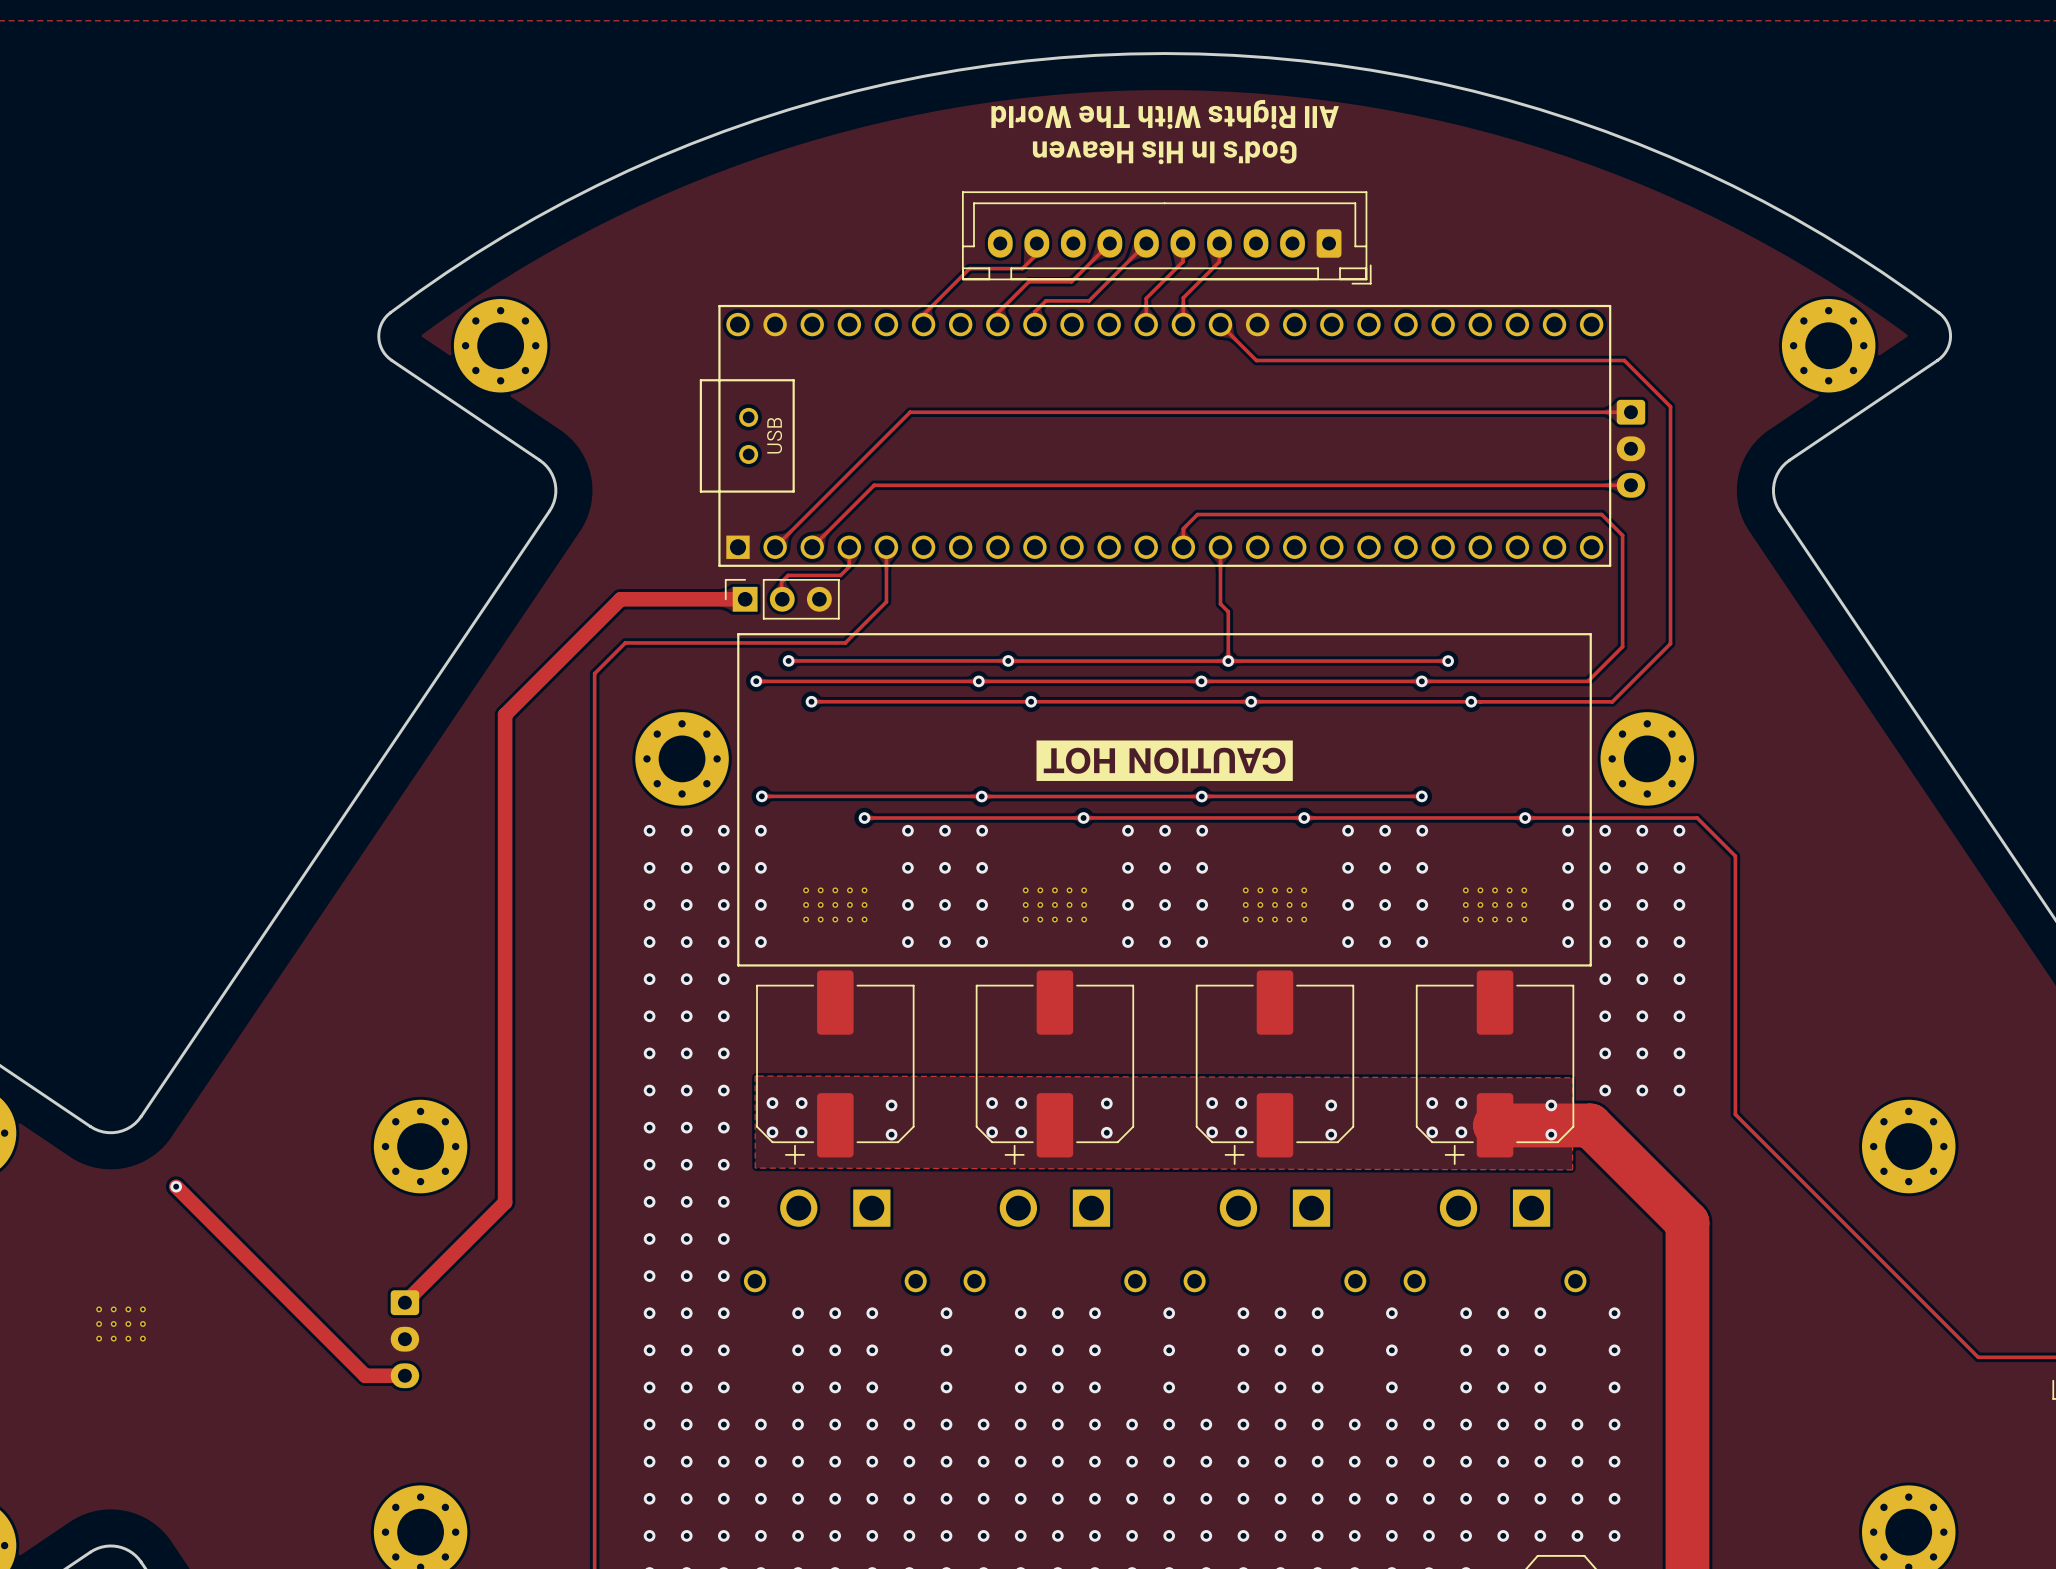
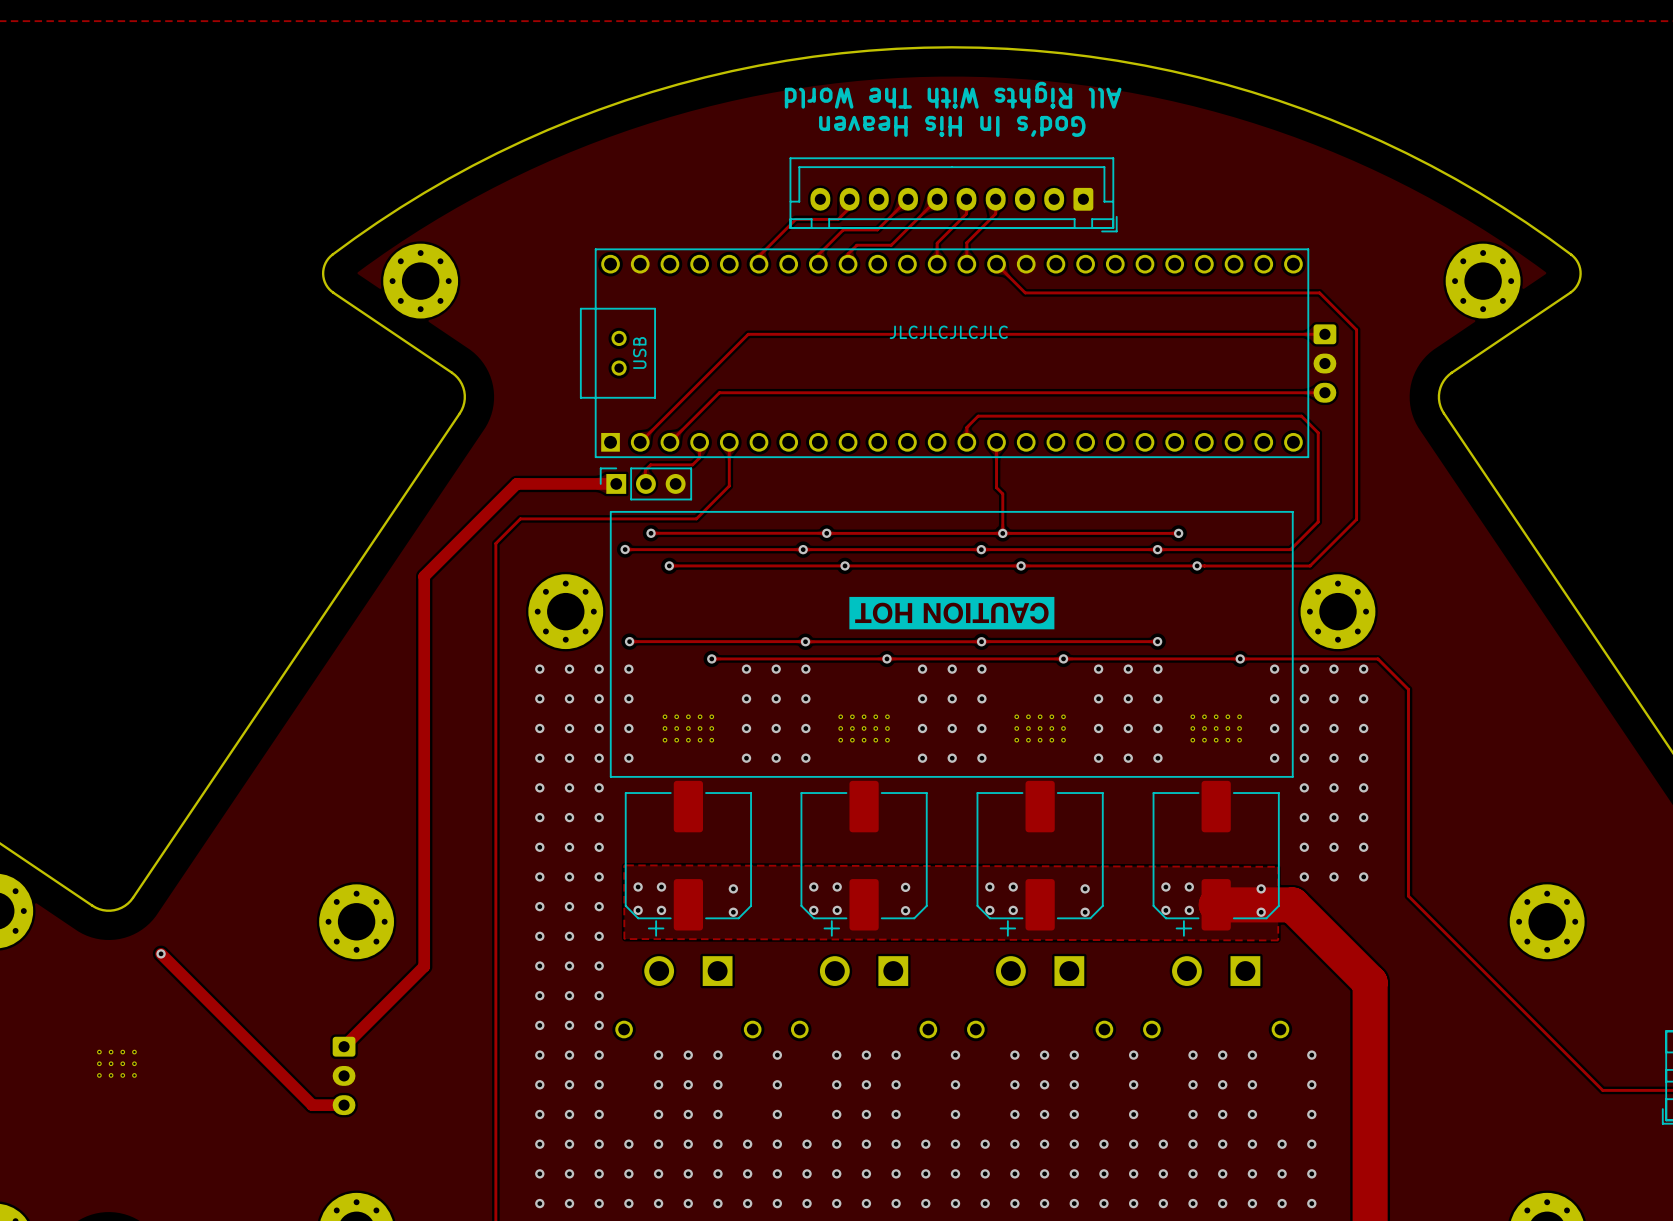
text: none -> JLCJLCJLCJLC (948, 332)

